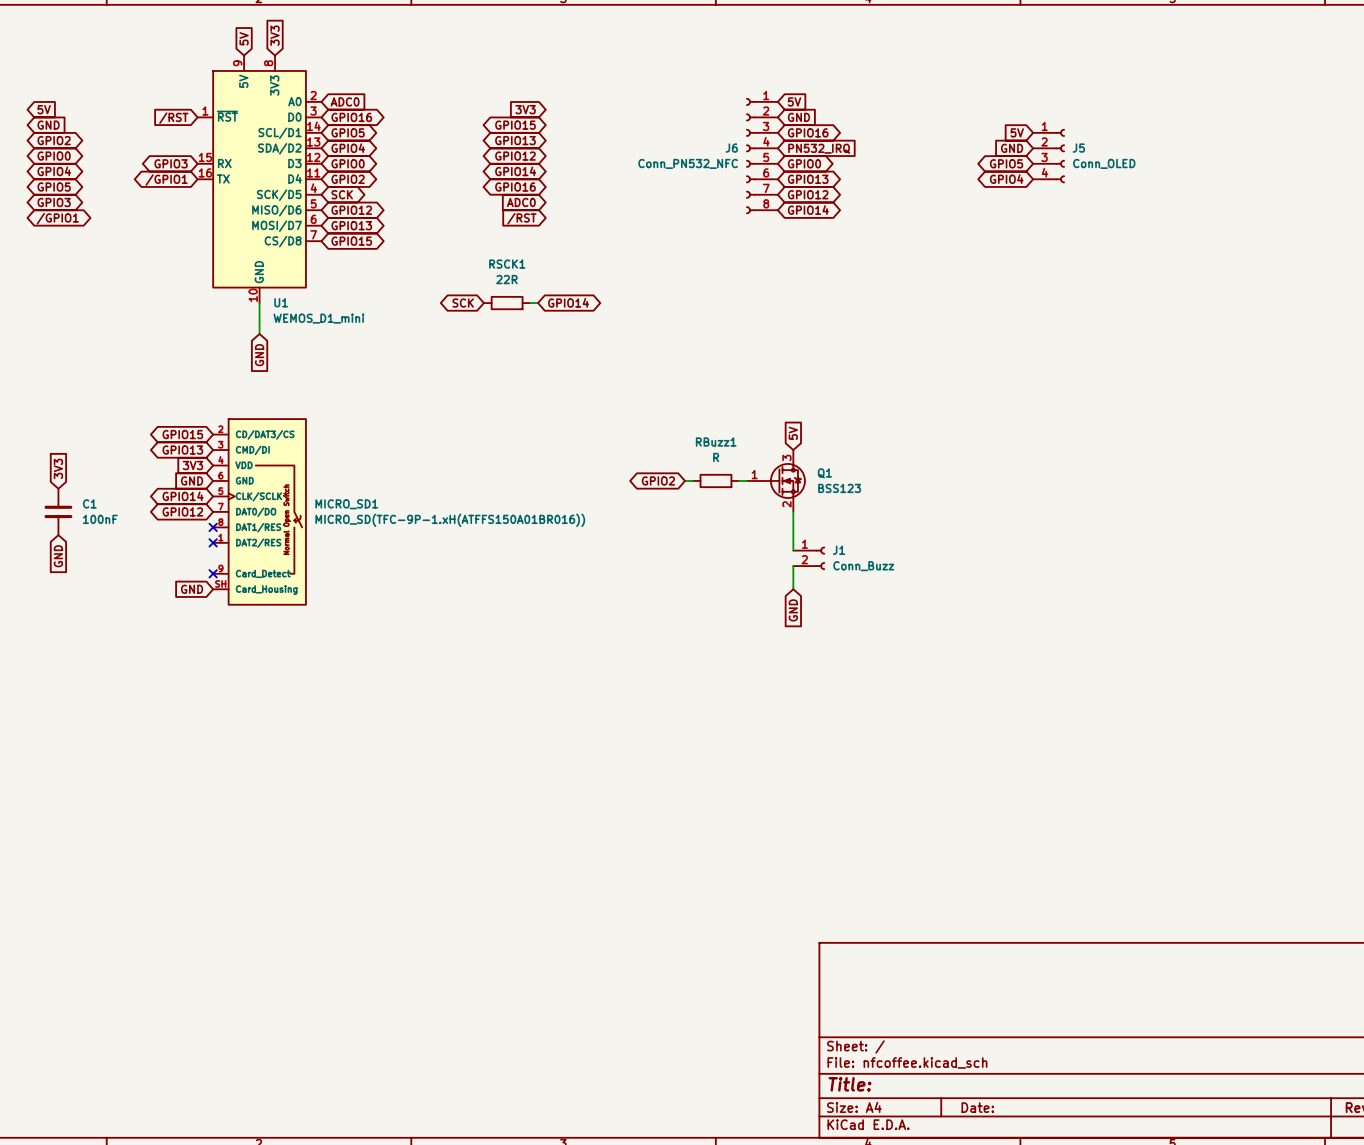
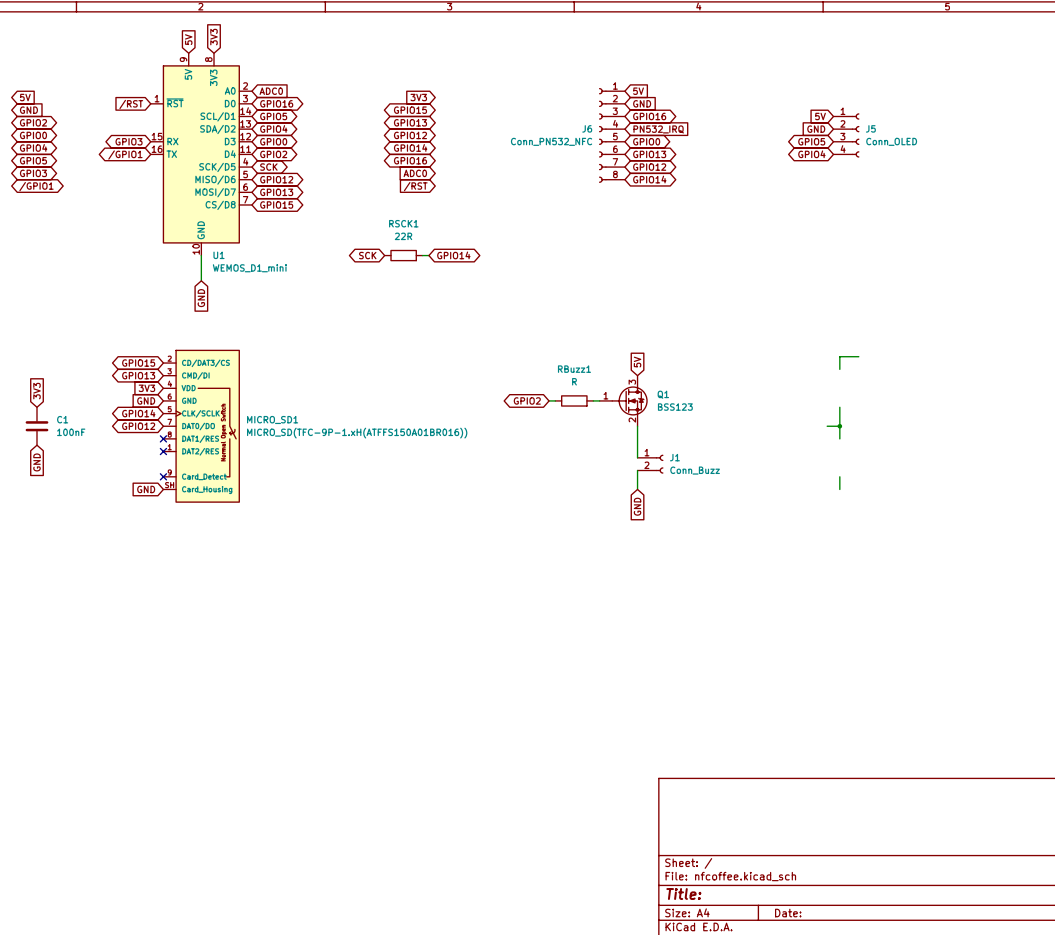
wire: none -> (858, 356) (839, 356) (839, 369)
wire: none -> (839, 407) (839, 438)
wire: none -> (827, 426) (839, 426)
junction: none -> (839, 426)
wire: none -> (839, 476) (839, 489)

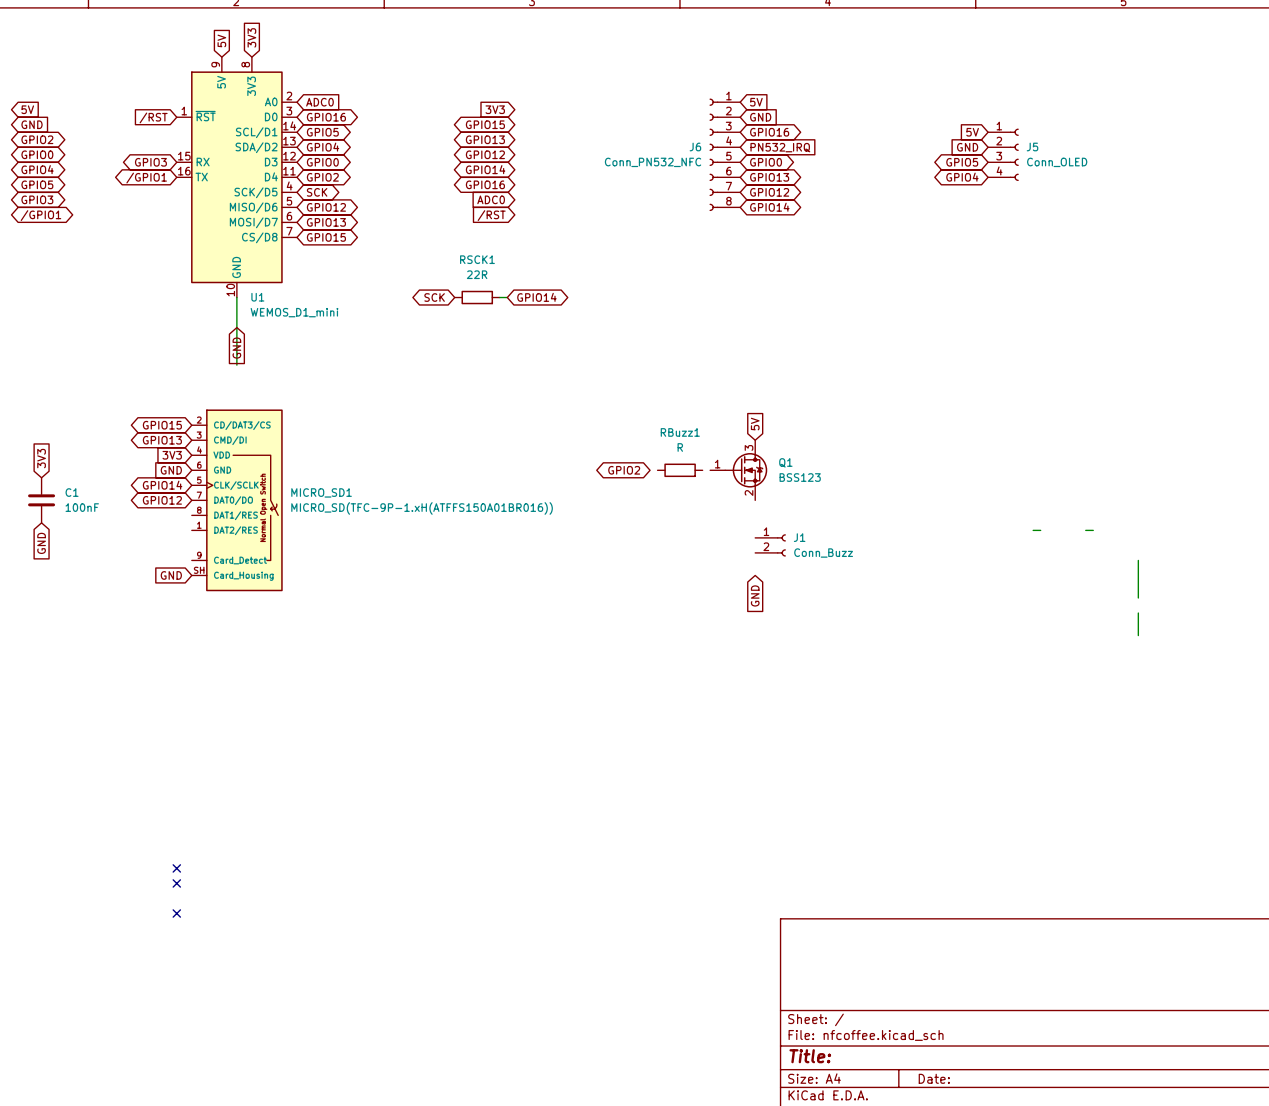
wire: none -> (236, 327) (236, 365)
wire: (858, 356) (839, 356) (839, 369) -> none
wire: (549, 400) (555, 400) -> none
wire: (593, 400) (599, 400) -> none
wire: (839, 407) (839, 438) -> none
wire: (637, 426) (637, 457) -> none
wire: (827, 426) (839, 426) -> none
junction: (839, 426) -> none
no-connect mark: (163, 438) -> none
no-connect mark: (163, 451) -> none
wire: none -> (1033, 530) (1040, 530)
wire: none -> (1085, 530) (1093, 530)
wire: (637, 470) (637, 489) -> none
no-connect mark: (163, 476) -> none
wire: (839, 476) (839, 489) -> none
wire: none -> (1138, 560) (1138, 598)
wire: none -> (1138, 613) (1138, 635)
no-connect mark: none -> (176, 868)
no-connect mark: none -> (176, 883)
no-connect mark: none -> (176, 913)

